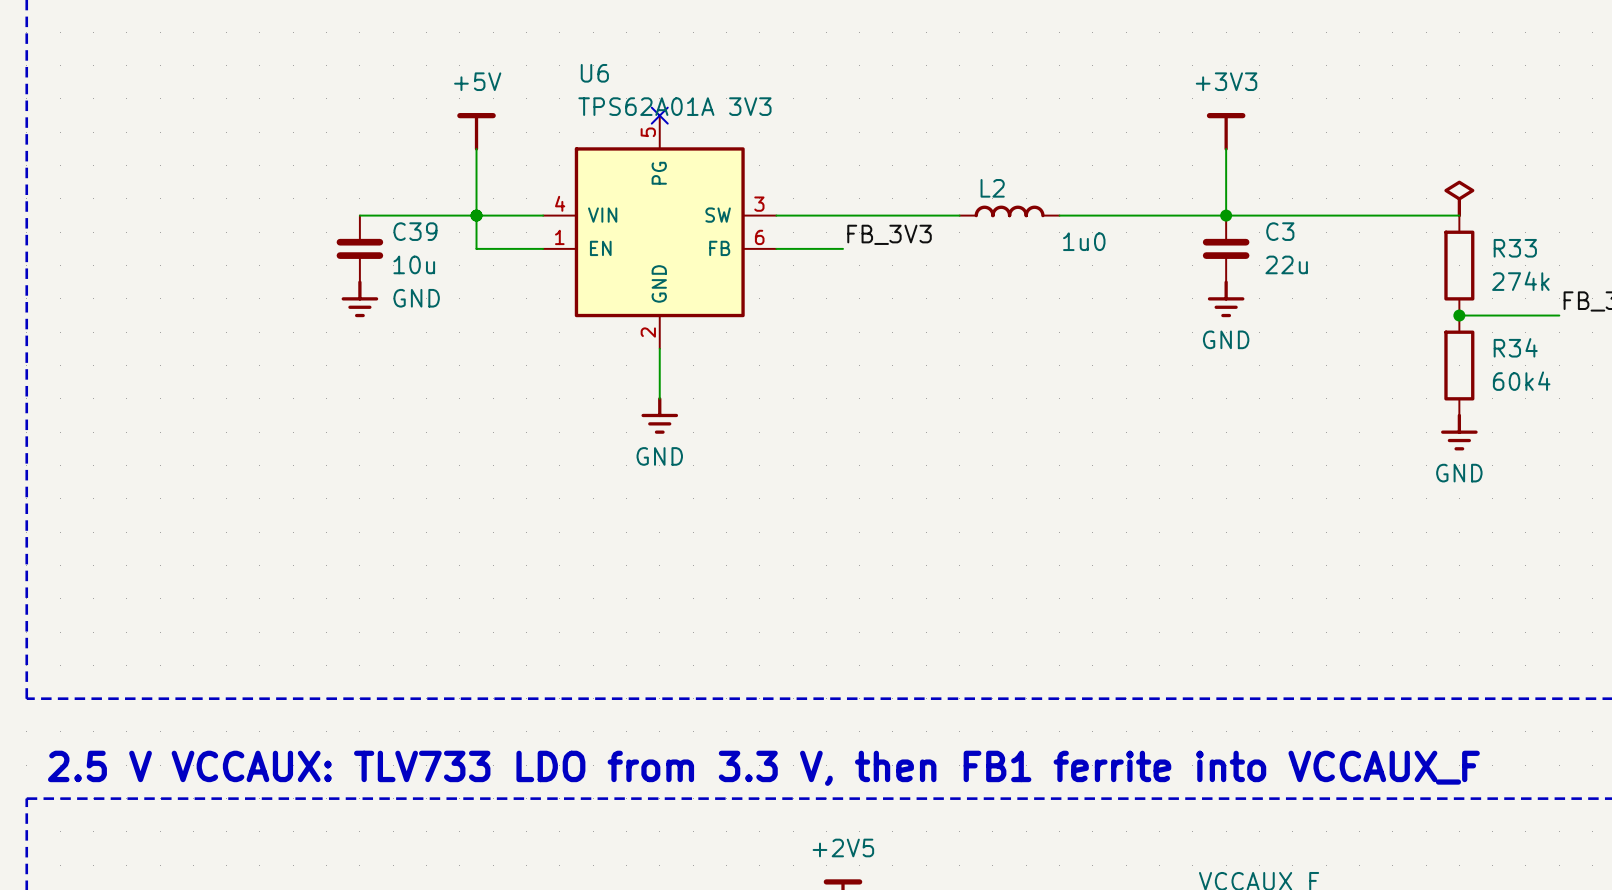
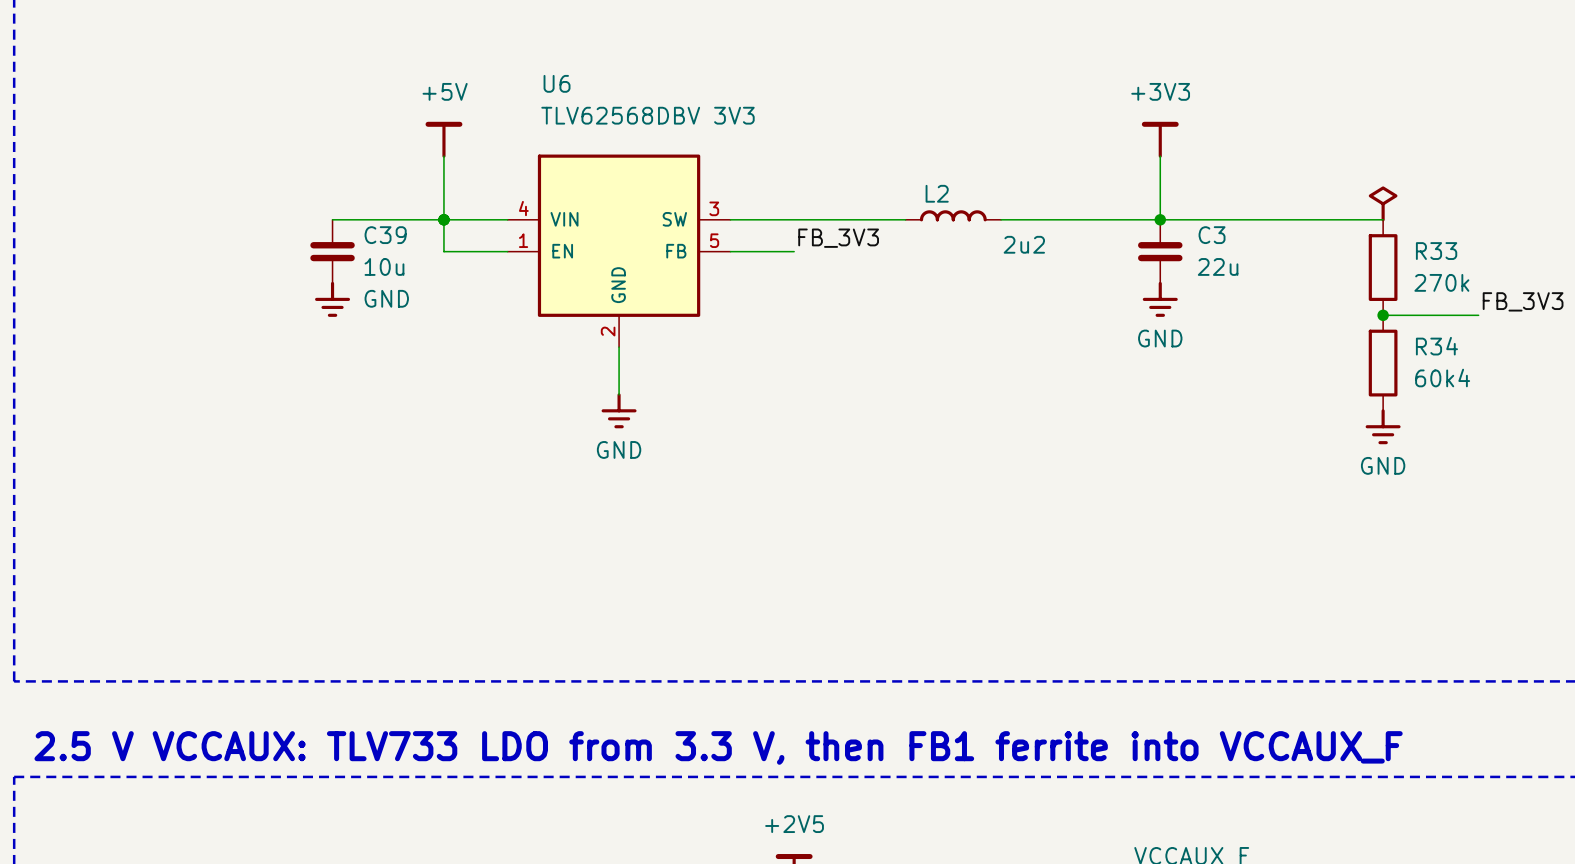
U6 value: TPS62A01A 3V3 (674, 106) -> TLV62568DBV 3V3 (647, 115)
U6 symbol: [543, 115, 777, 349] -> [507, 154, 731, 348]
no-connect mark: (659, 115) -> none
L2 value: 1u0 (1084, 241) -> 2u2 (1024, 244)
R33 value: 274k (1520, 281) -> 270k (1441, 282)

